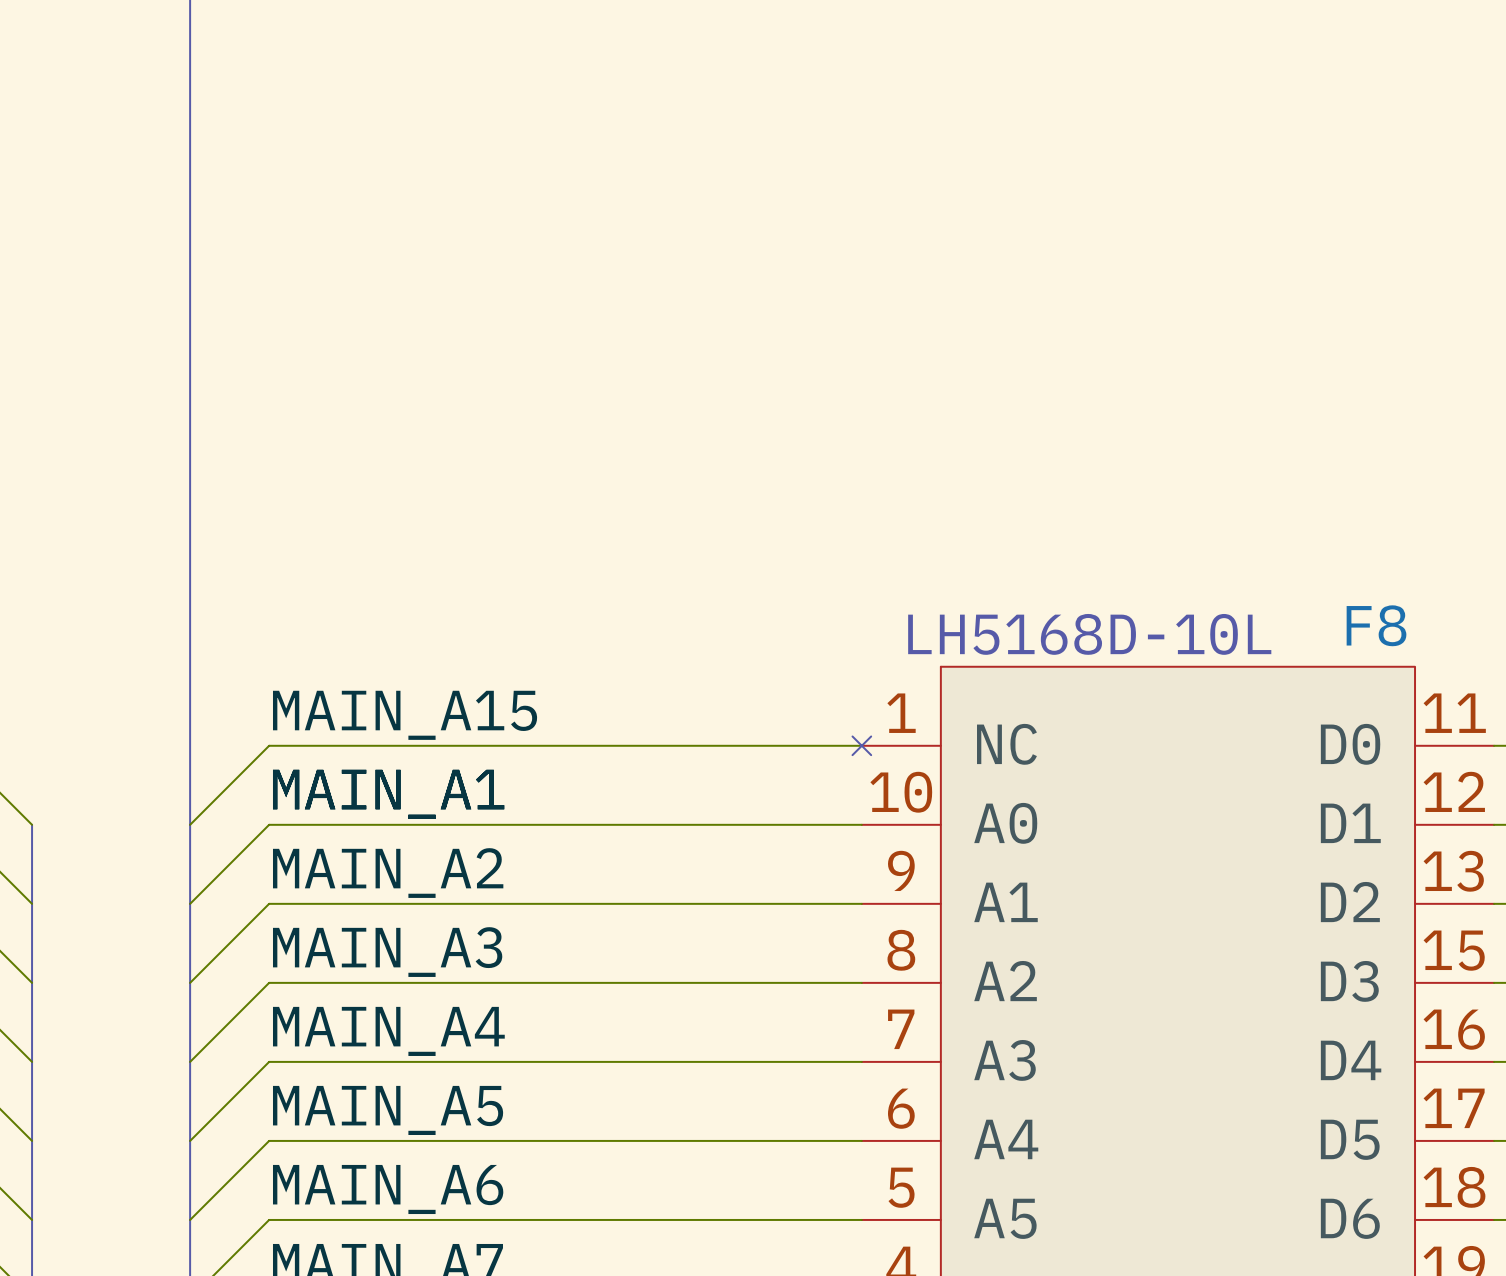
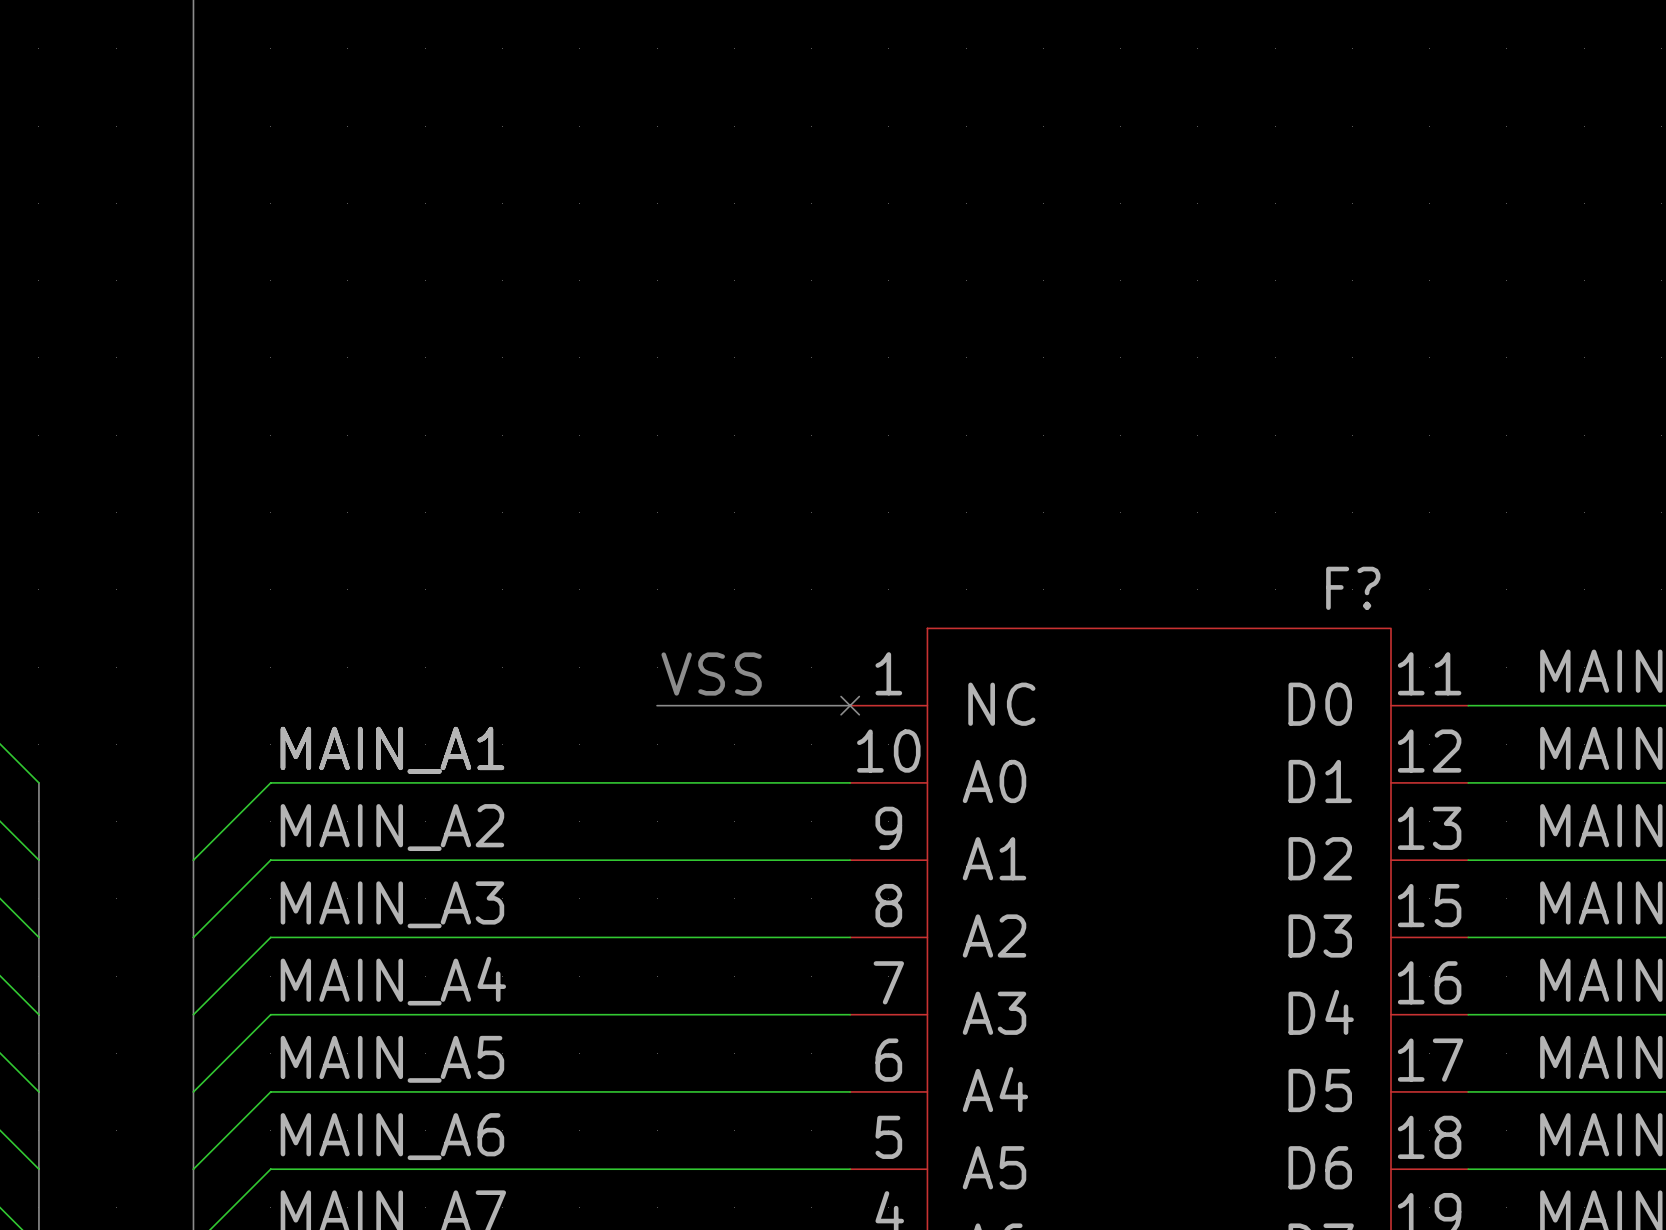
F8 name: F8 (1376, 625) -> F? (1353, 588)
text: LH5168D-10L (1089, 634) -> none
text: none -> VSS (711, 674)
label: MAIN_A15 (405, 715) -> none
line: none -> (657, 705) (850, 705)
wire: (861, 745) (269, 745) (190, 824) -> none

